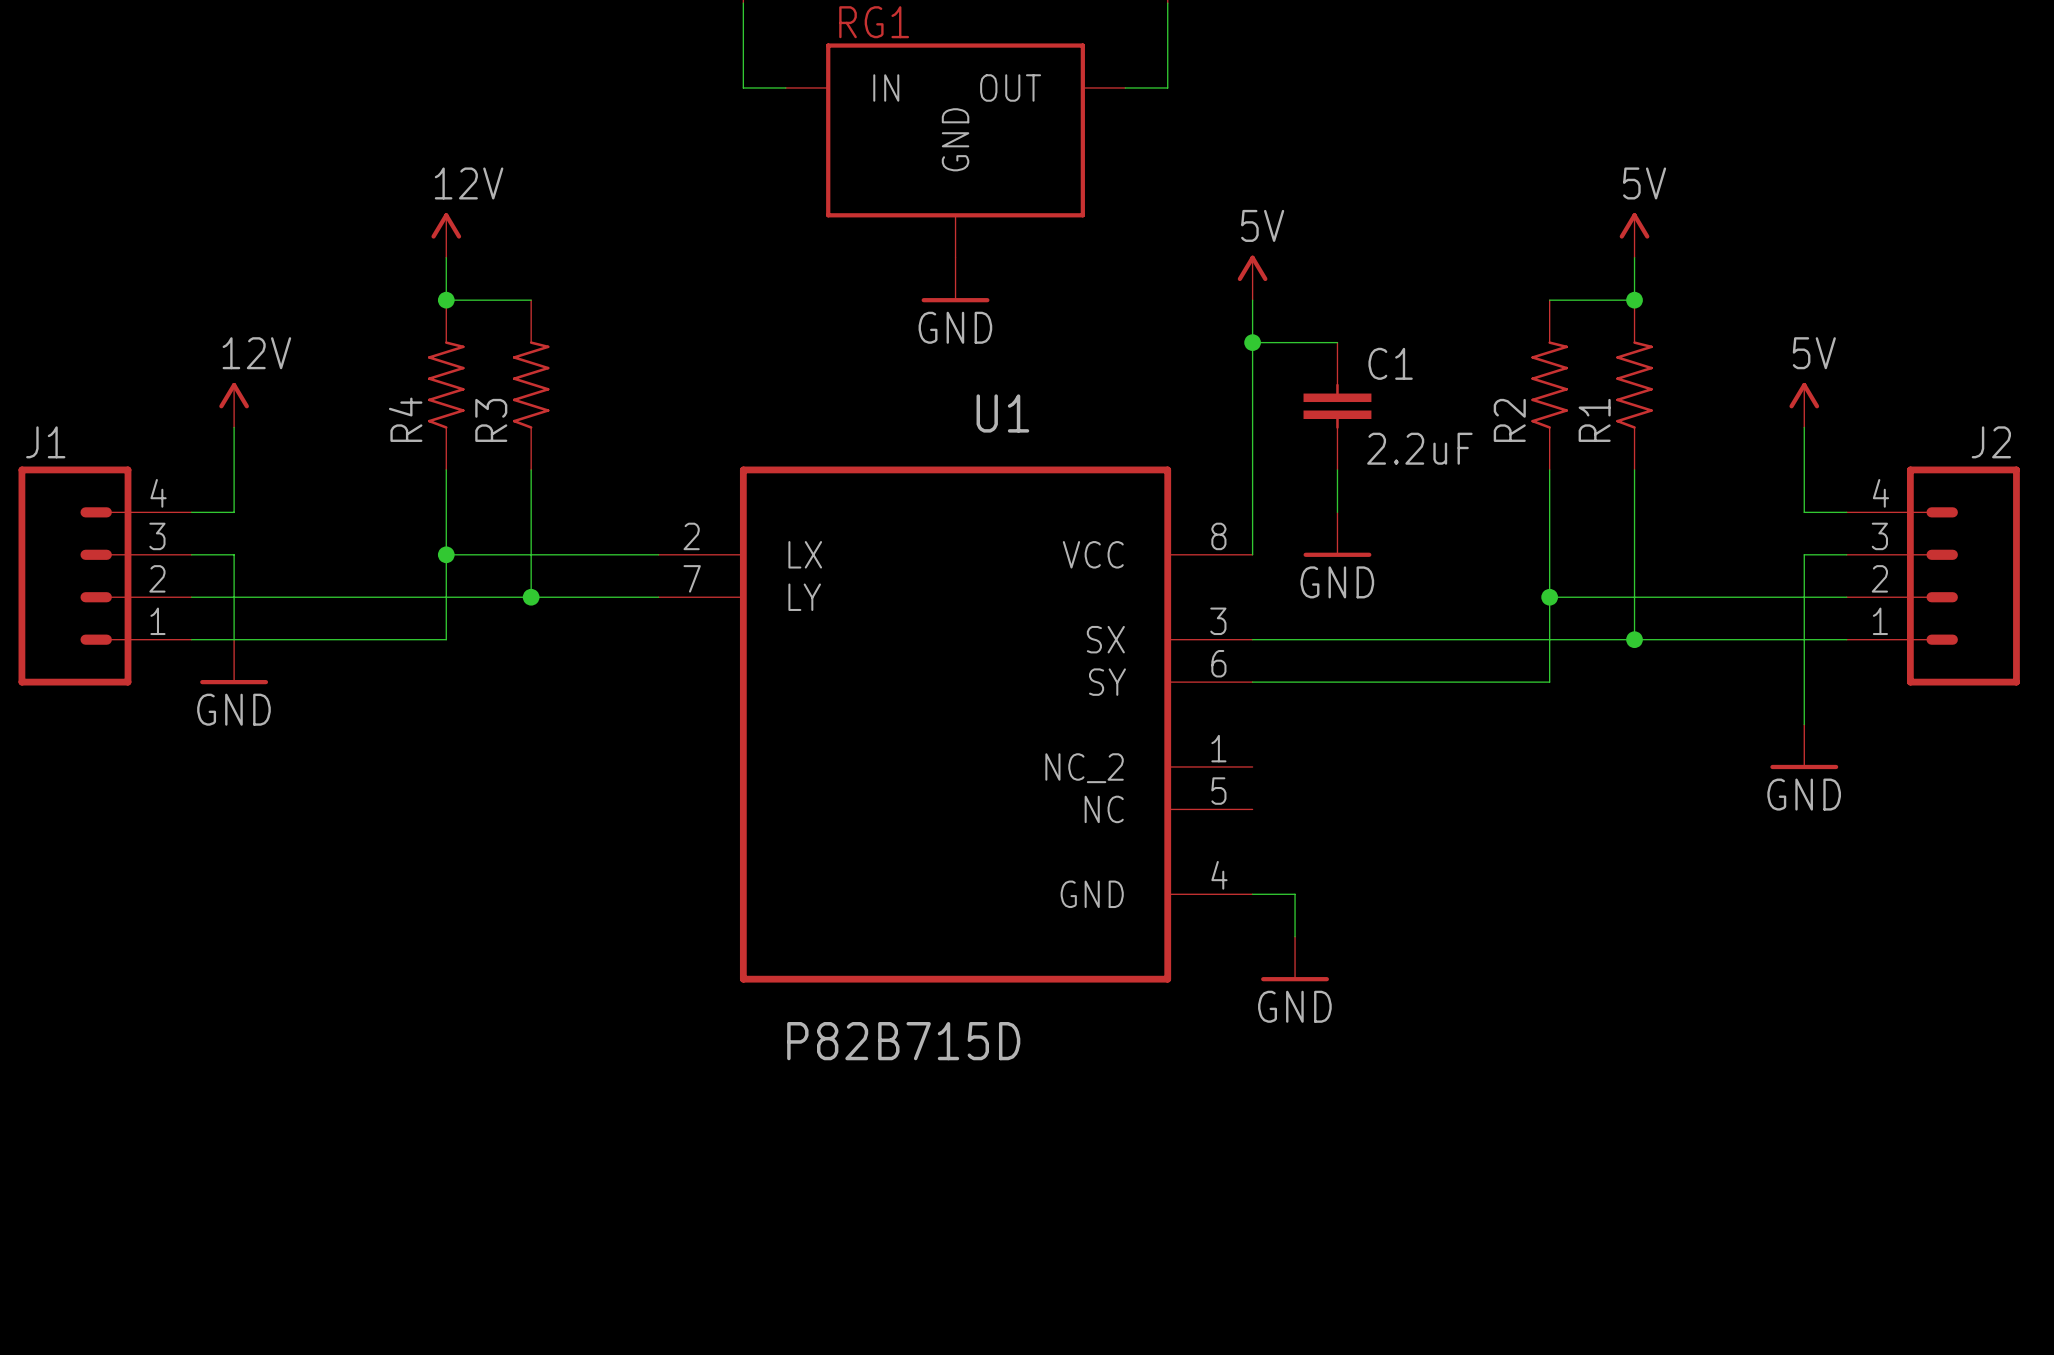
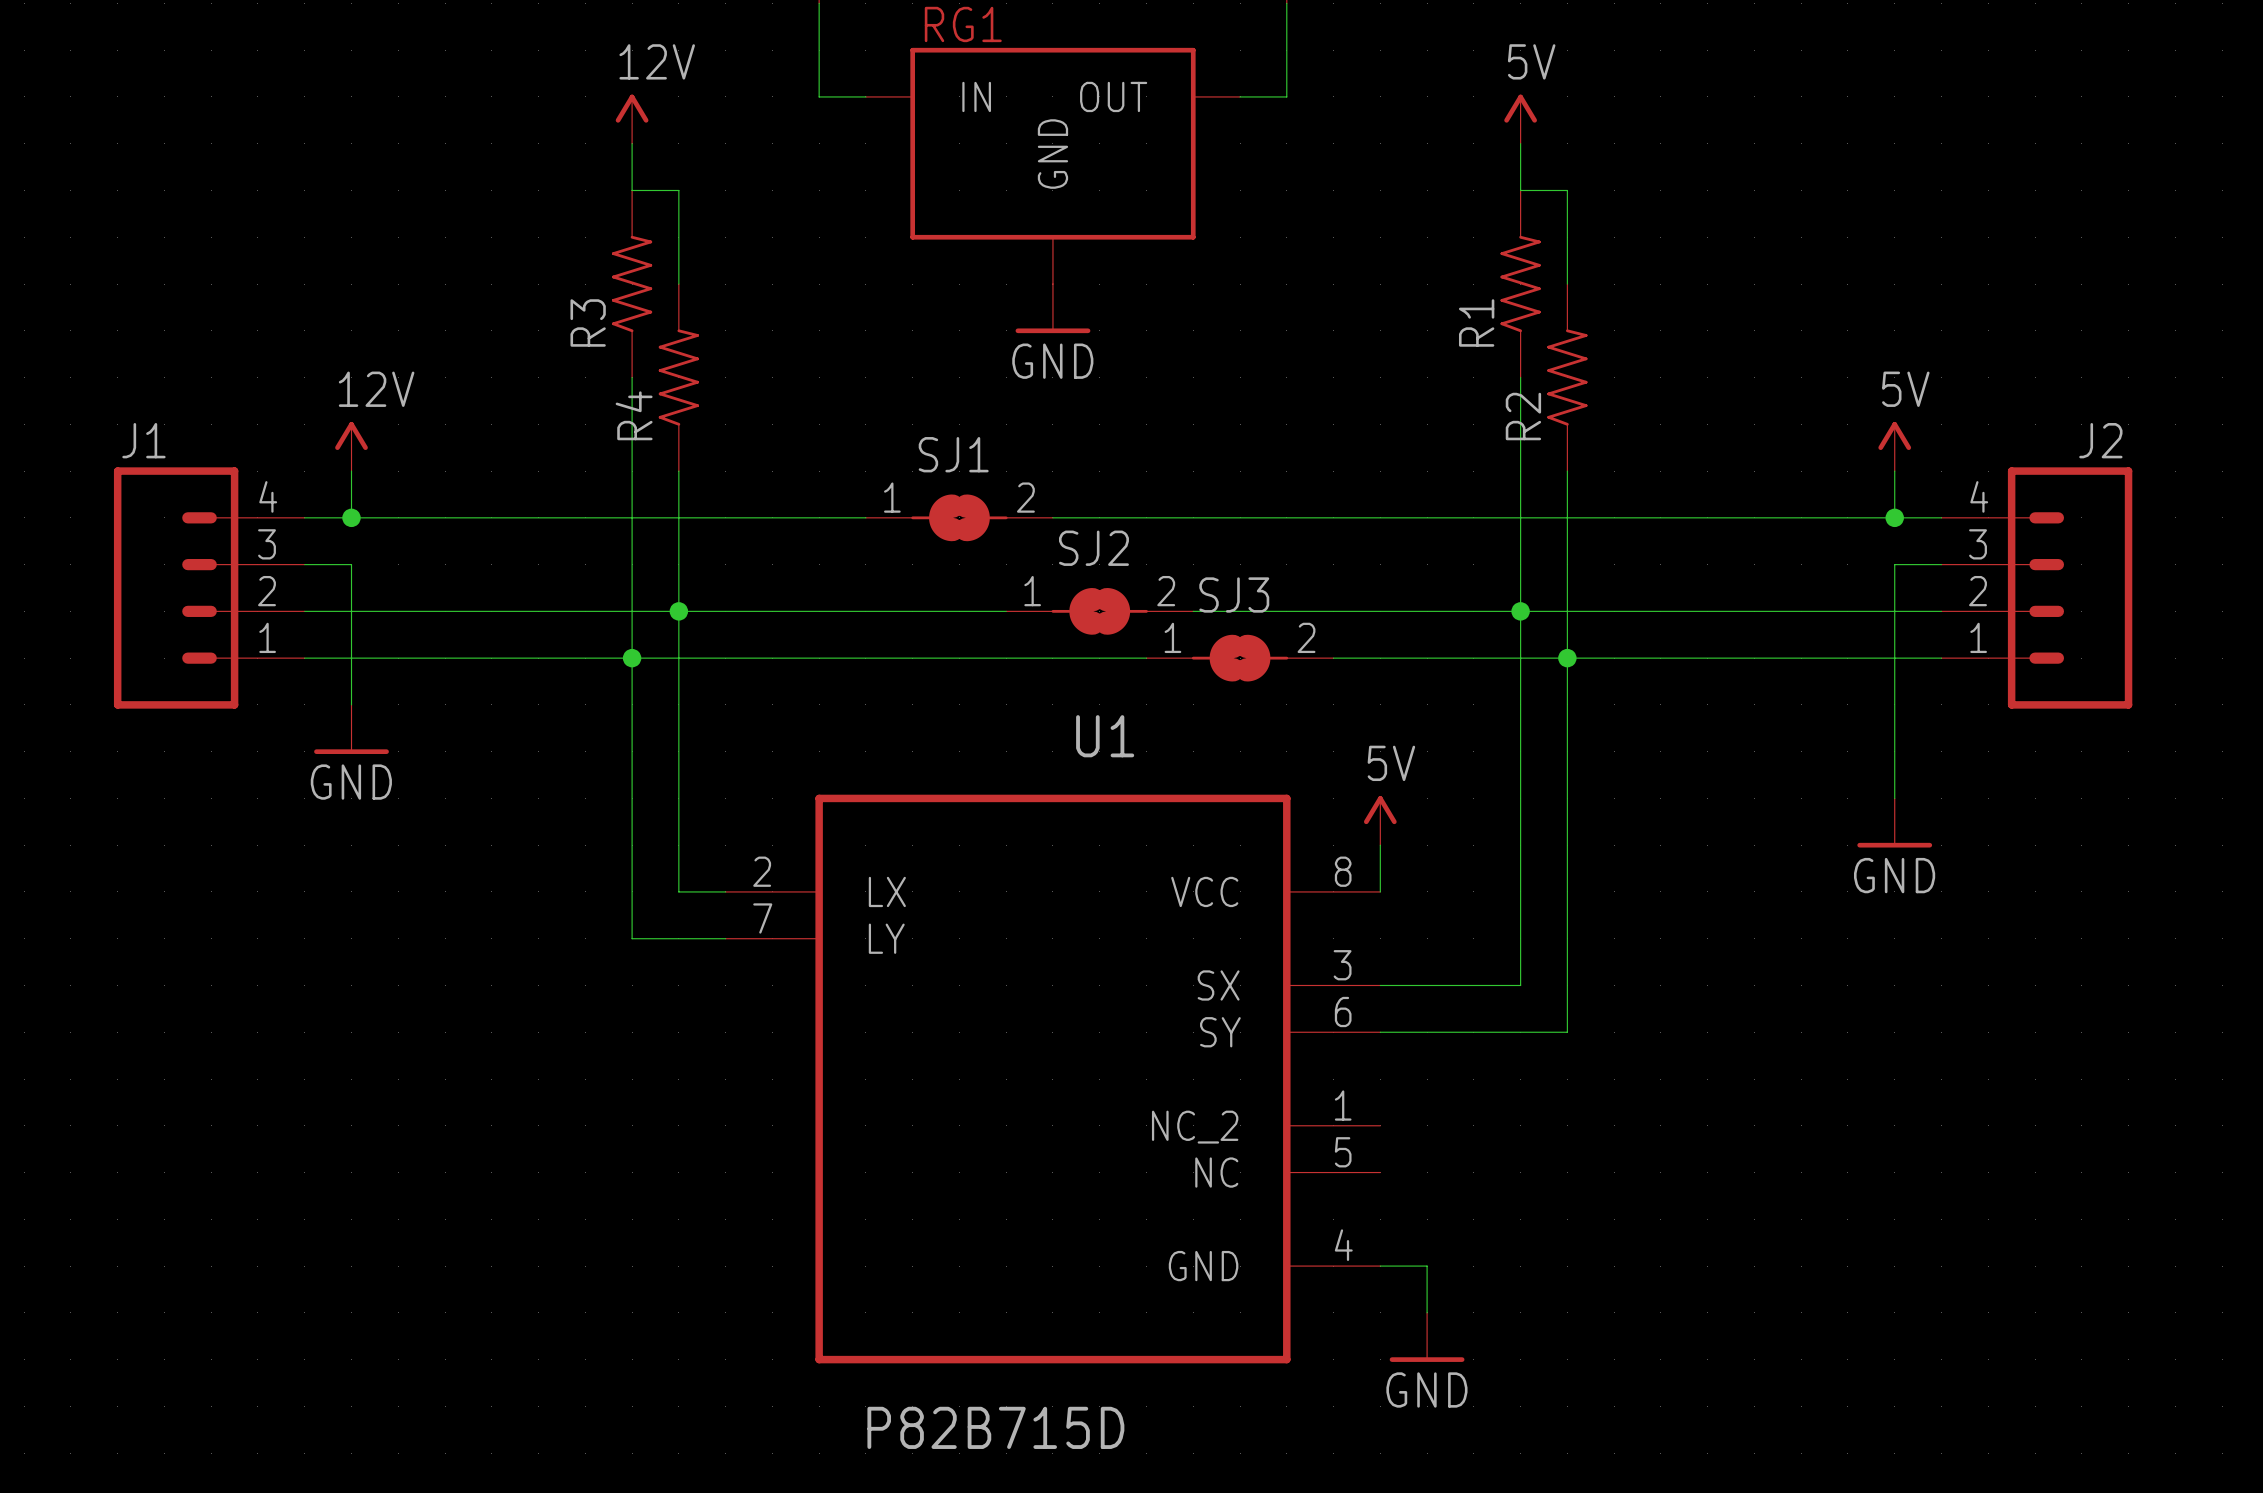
power symbol: none -> 12V (632, 119)
power symbol: none -> 5V (1520, 119)
wire: none -> (632, 143) (632, 190) (678, 190) (678, 284)
wire: none -> (1520, 143) (1520, 190) (1567, 190) (1567, 284)
power symbol: 12V (446, 235) -> none
power symbol: 5V (1634, 235) -> none
wire: (446, 257) (446, 300) (531, 300) -> none
wire: (1634, 257) (1634, 300) (1549, 300) -> none
power symbol: 5V (1252, 277) -> none
junction: (446, 300) -> none
wire: (1252, 300) (1252, 554) -> none
junction: (1634, 300) -> none
wire: none -> (632, 377) (632, 938) (725, 938)
wire: (1252, 342) (1337, 342) -> none
junction: (1252, 342) -> none
R4 position: (446, 385) -> (678, 377)
R3 position: (531, 385) -> (632, 284)
R2 position: (1549, 385) -> (1567, 377)
R1 position: (1634, 385) -> (1520, 284)
power symbol position: 12V (234, 405) -> 12V (351, 446)
power symbol position: 5V (1804, 405) -> 5V (1894, 446)
C1: 2.2uF (1337, 406) -> none
wire: (234, 427) (234, 512) (191, 512) -> none
wire: none -> (351, 471) (351, 517)
wire: none -> (678, 471) (678, 891) (725, 891)
wire: none -> (1567, 471) (1567, 1032) (1380, 1032)
wire: none -> (1894, 471) (1894, 517)
wire: (1804, 427) (1804, 512) (1846, 512) -> none
wire: none -> (304, 517) (865, 517)
junction: none -> (351, 517)
wire: (446, 469) (446, 639) (191, 639) -> none
wire: (531, 469) (531, 597) -> none
SJ1: none -> (959, 517)
wire: none -> (1052, 517) (1941, 517)
wire: (1337, 469) (1337, 512) -> (1380, 845) (1380, 891)
wire: (1549, 469) (1549, 682) (1252, 682) -> none
wire: (1634, 469) (1634, 639) -> none
junction: none -> (1894, 517)
wire: none -> (304, 564) (351, 564) (351, 704)
wire: none -> (1941, 564) (1894, 564) (1894, 798)
power symbol: GND (1337, 534) -> none
wire: (191, 554) (234, 554) (234, 639) -> none
wire: none -> (304, 611) (491, 611)
junction: (446, 554) -> none
junction: none -> (678, 611)
wire: none -> (725, 611) (1006, 611)
SJ2: none -> (1099, 611)
wire: none -> (1193, 611) (1941, 611)
junction: none -> (1520, 611)
wire: (1846, 554) (1804, 554) (1804, 724) -> none
J1 position: (105, 576) -> (209, 587)
J2 position: (1933, 576) -> (2036, 587)
junction position: (531, 597) -> (632, 658)
wire: none -> (725, 658) (1146, 658)
SJ3: none -> (1240, 658)
wire: none -> (1333, 658) (1707, 658)
junction: none -> (1567, 658)
junction: (1549, 597) -> none
wire: (1252, 639) (1846, 639) -> none
junction: (1634, 639) -> none
power symbol position: GND (234, 661) -> GND (351, 729)
U1 position: (955, 724) -> (1052, 1079)
power symbol: none -> 5V (1380, 820)
power symbol position: GND (1804, 746) -> GND (1894, 822)
wire: (1295, 894) (1295, 936) -> (1427, 985) (1520, 985) (1520, 377)
power symbol: GND (1295, 959) -> none
wire: none -> (1380, 1266) (1427, 1266) (1427, 1312)
power symbol: none -> GND (1427, 1337)

